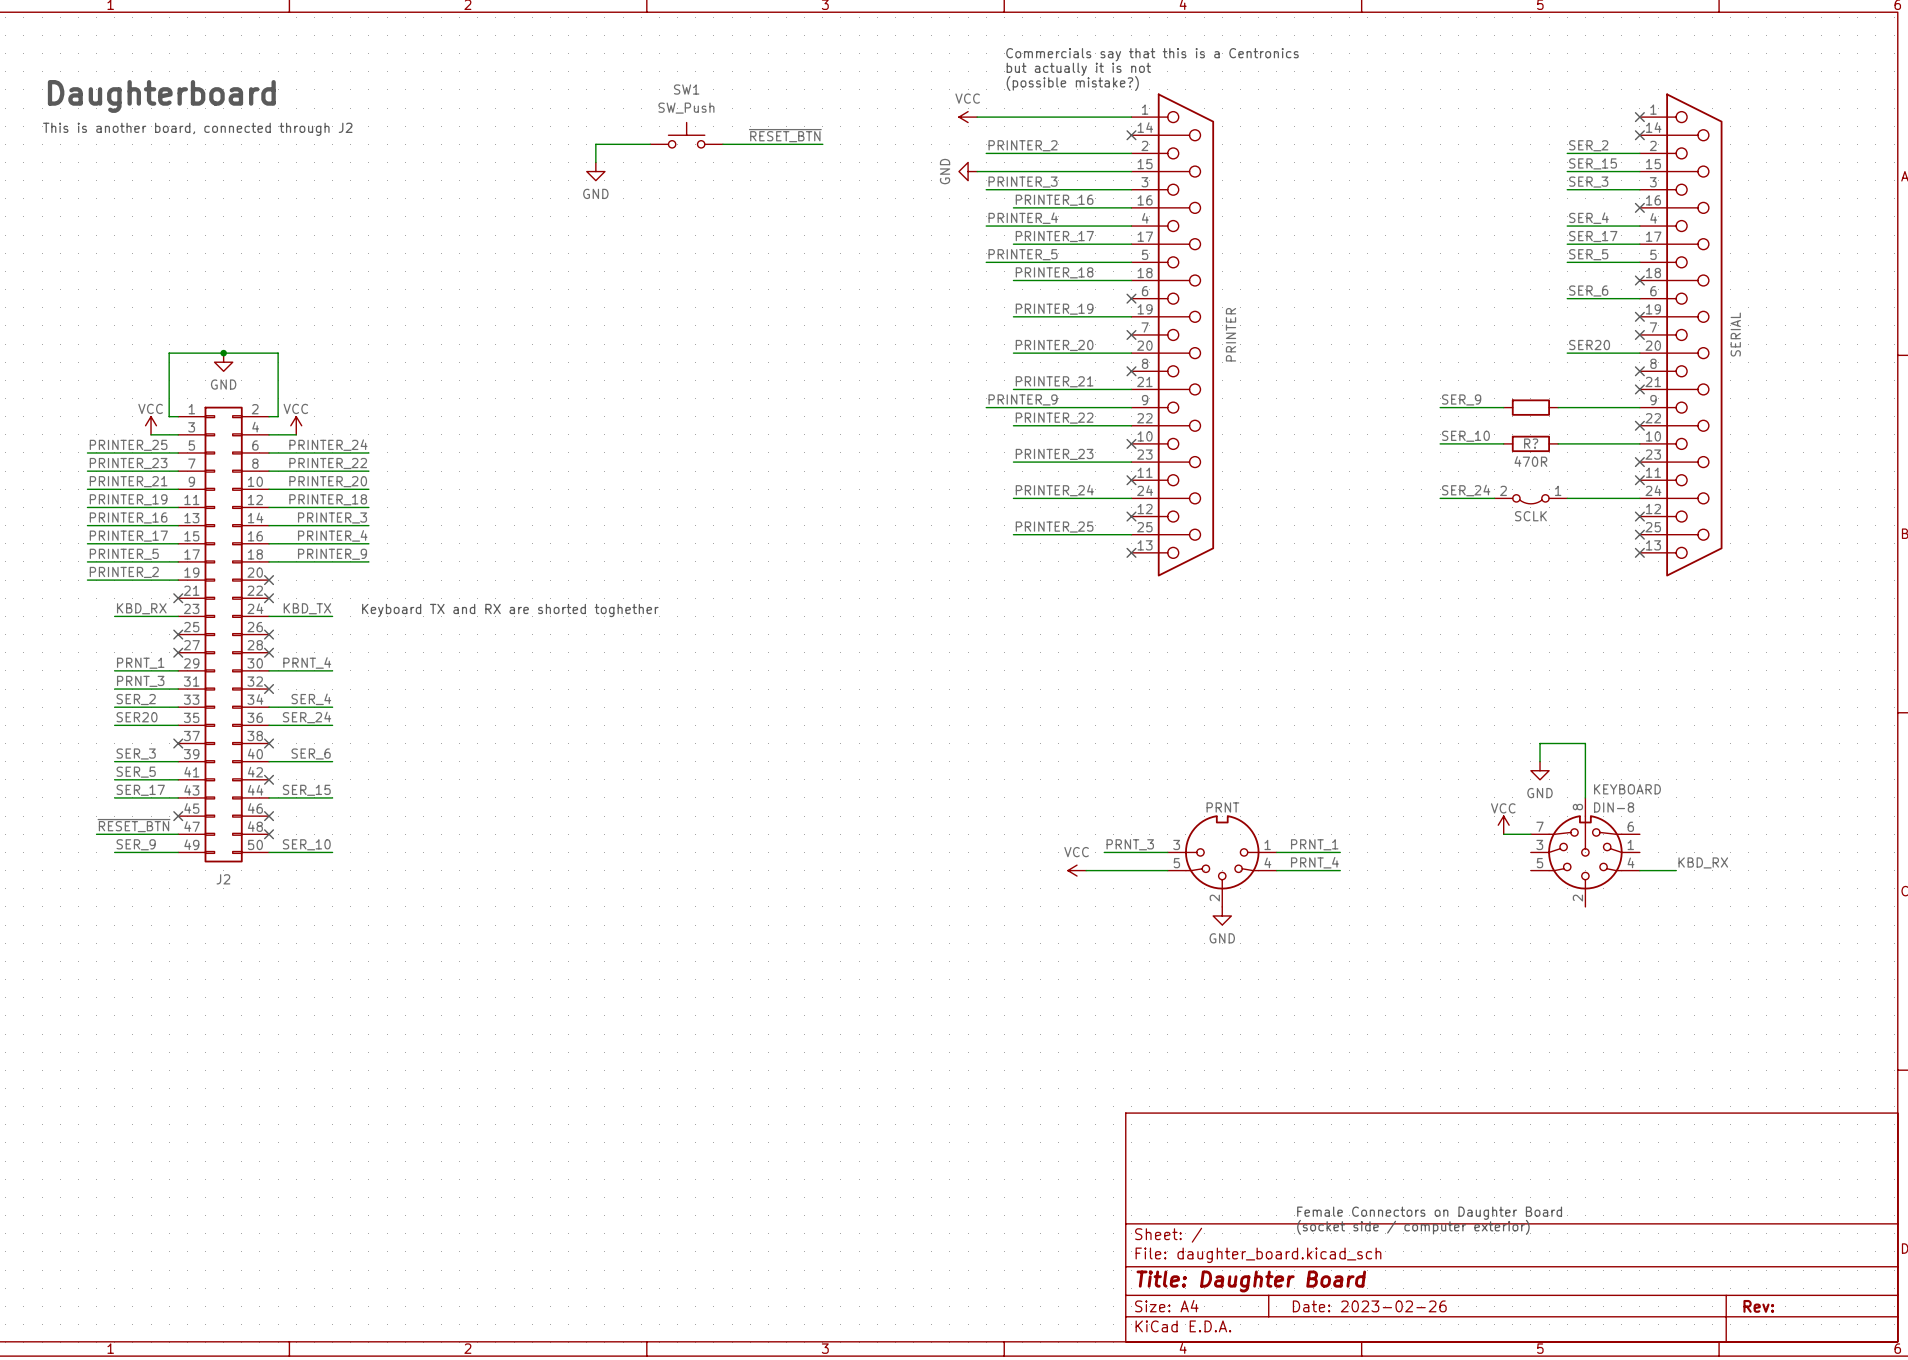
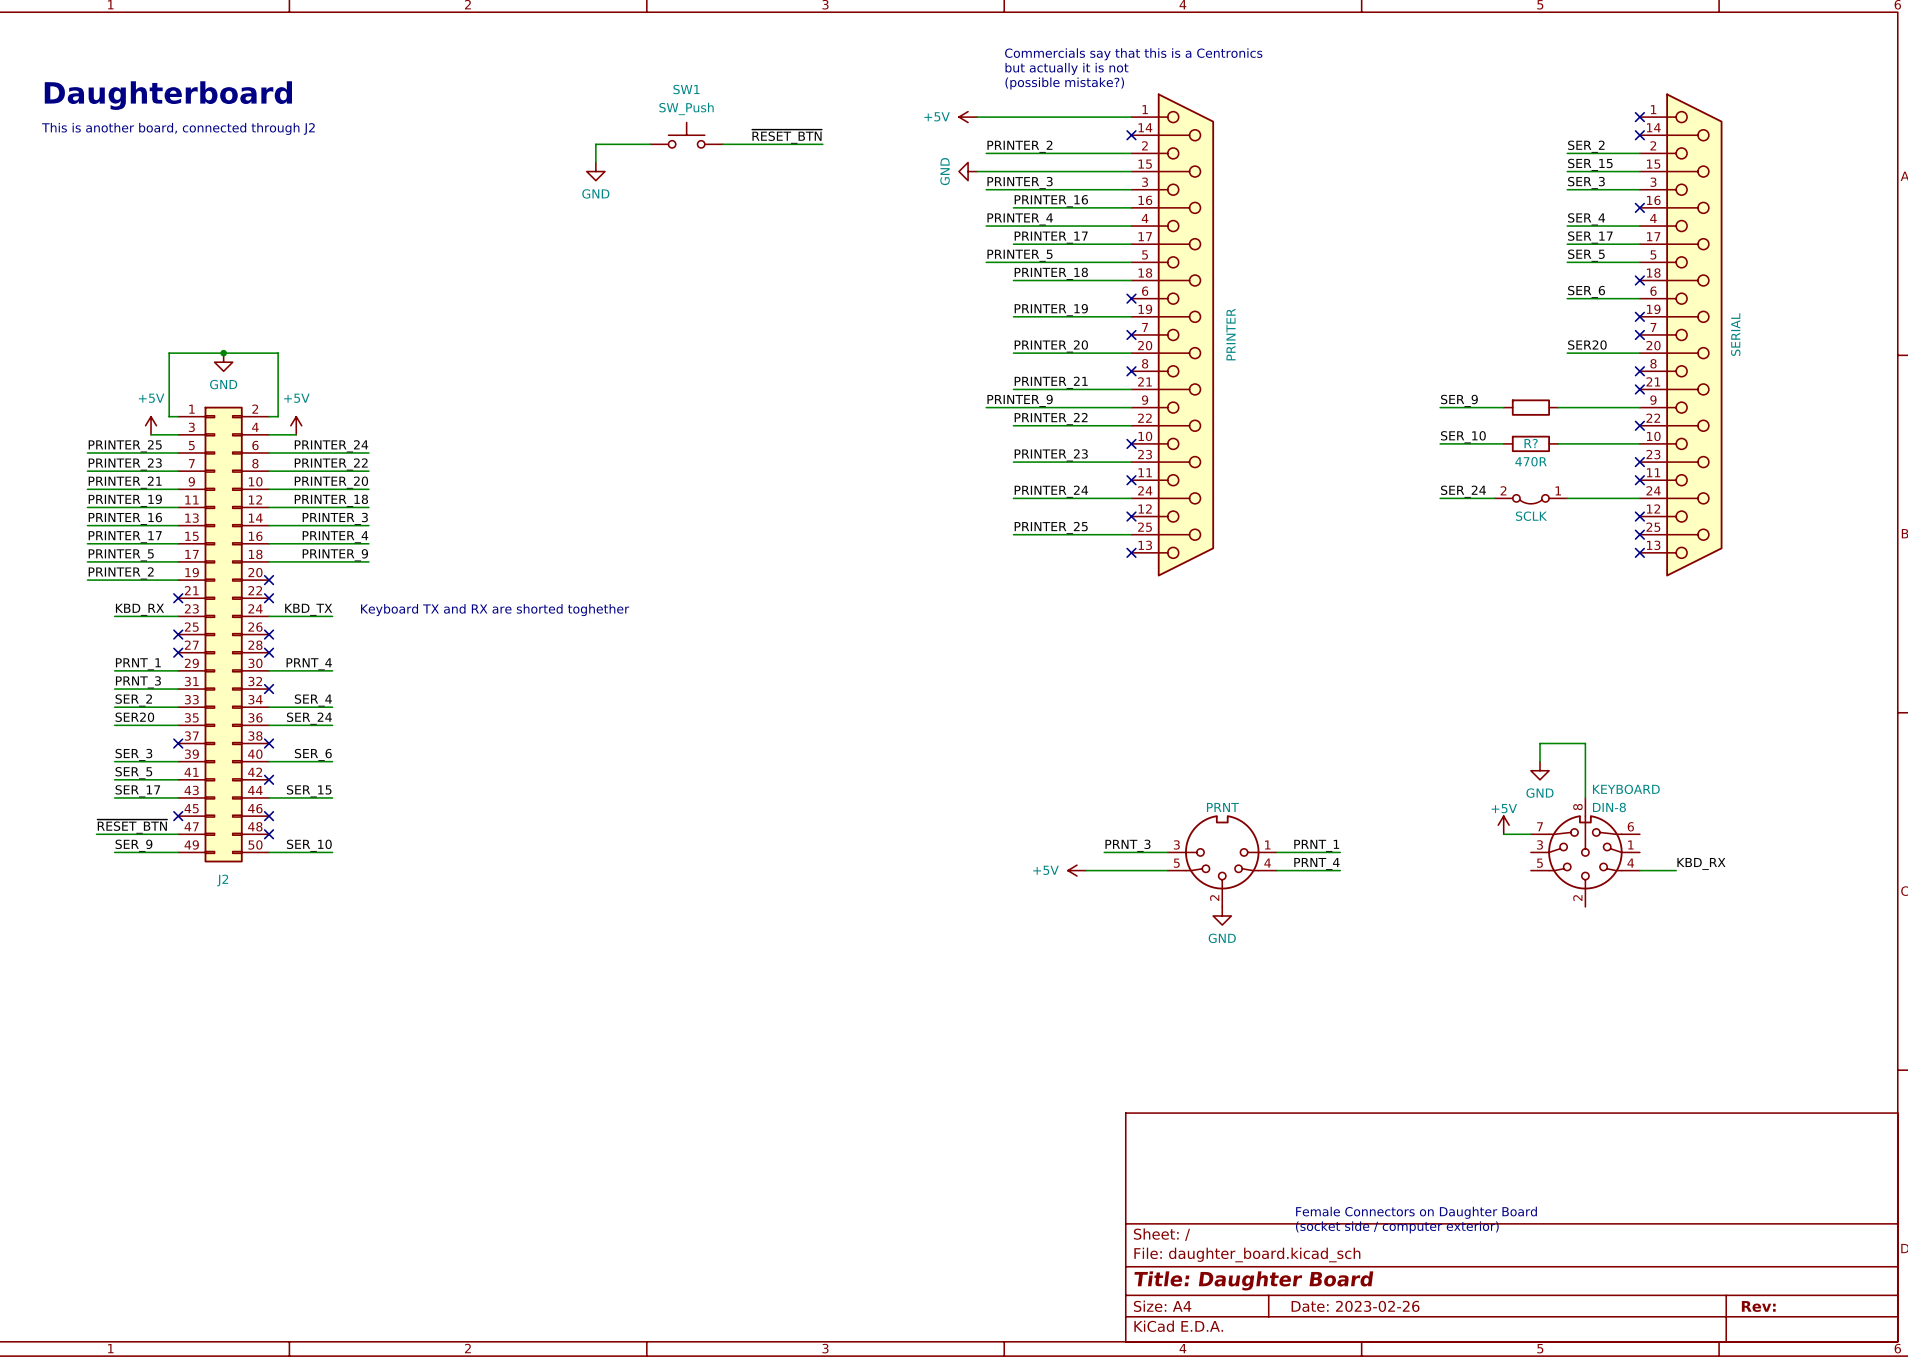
power symbol: VCC (968, 117) -> +5V (968, 117)
power symbol: VCC (151, 425) -> +5V (151, 425)
power symbol: VCC (296, 425) -> +5V (296, 425)
power symbol: VCC (1503, 825) -> +5V (1503, 825)
power symbol: VCC (1077, 870) -> +5V (1077, 870)

